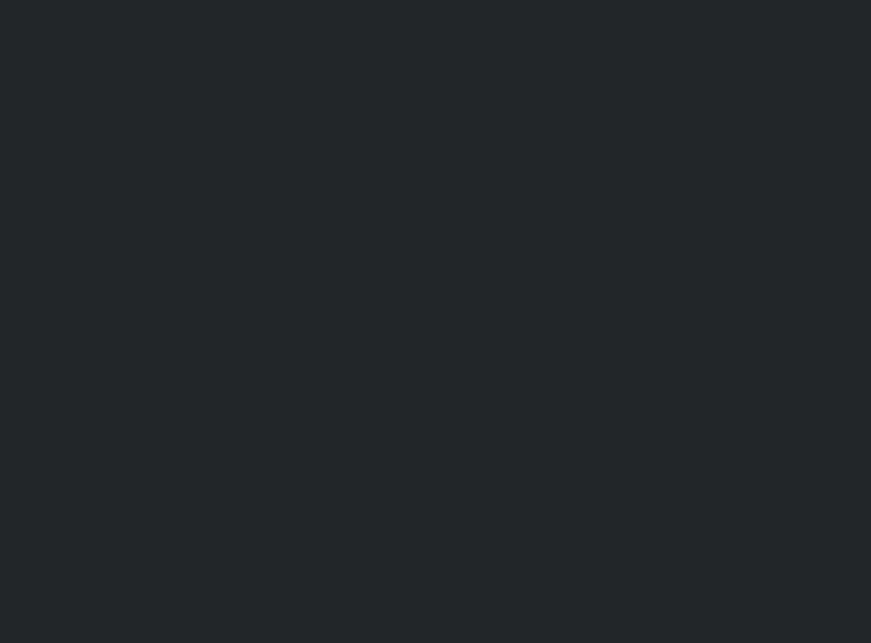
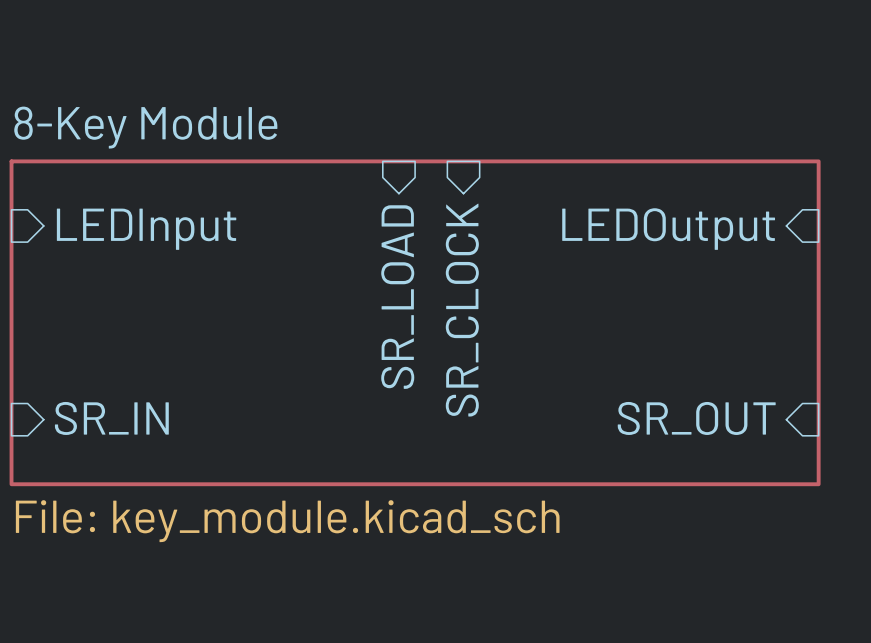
sheet pin: none -> LEDInput (146, 229)
sheet pin: none -> LEDOutput (668, 229)
sheet pin: none -> SR_LOAD (397, 297)
sheet pin: none -> SR_CLOCK (462, 310)
sheet 8-Key Module: none -> File: key_module.kicad_sch (415, 322)
sheet pin: none -> SR_IN (111, 418)
sheet pin: none -> SR_OUT (696, 418)

